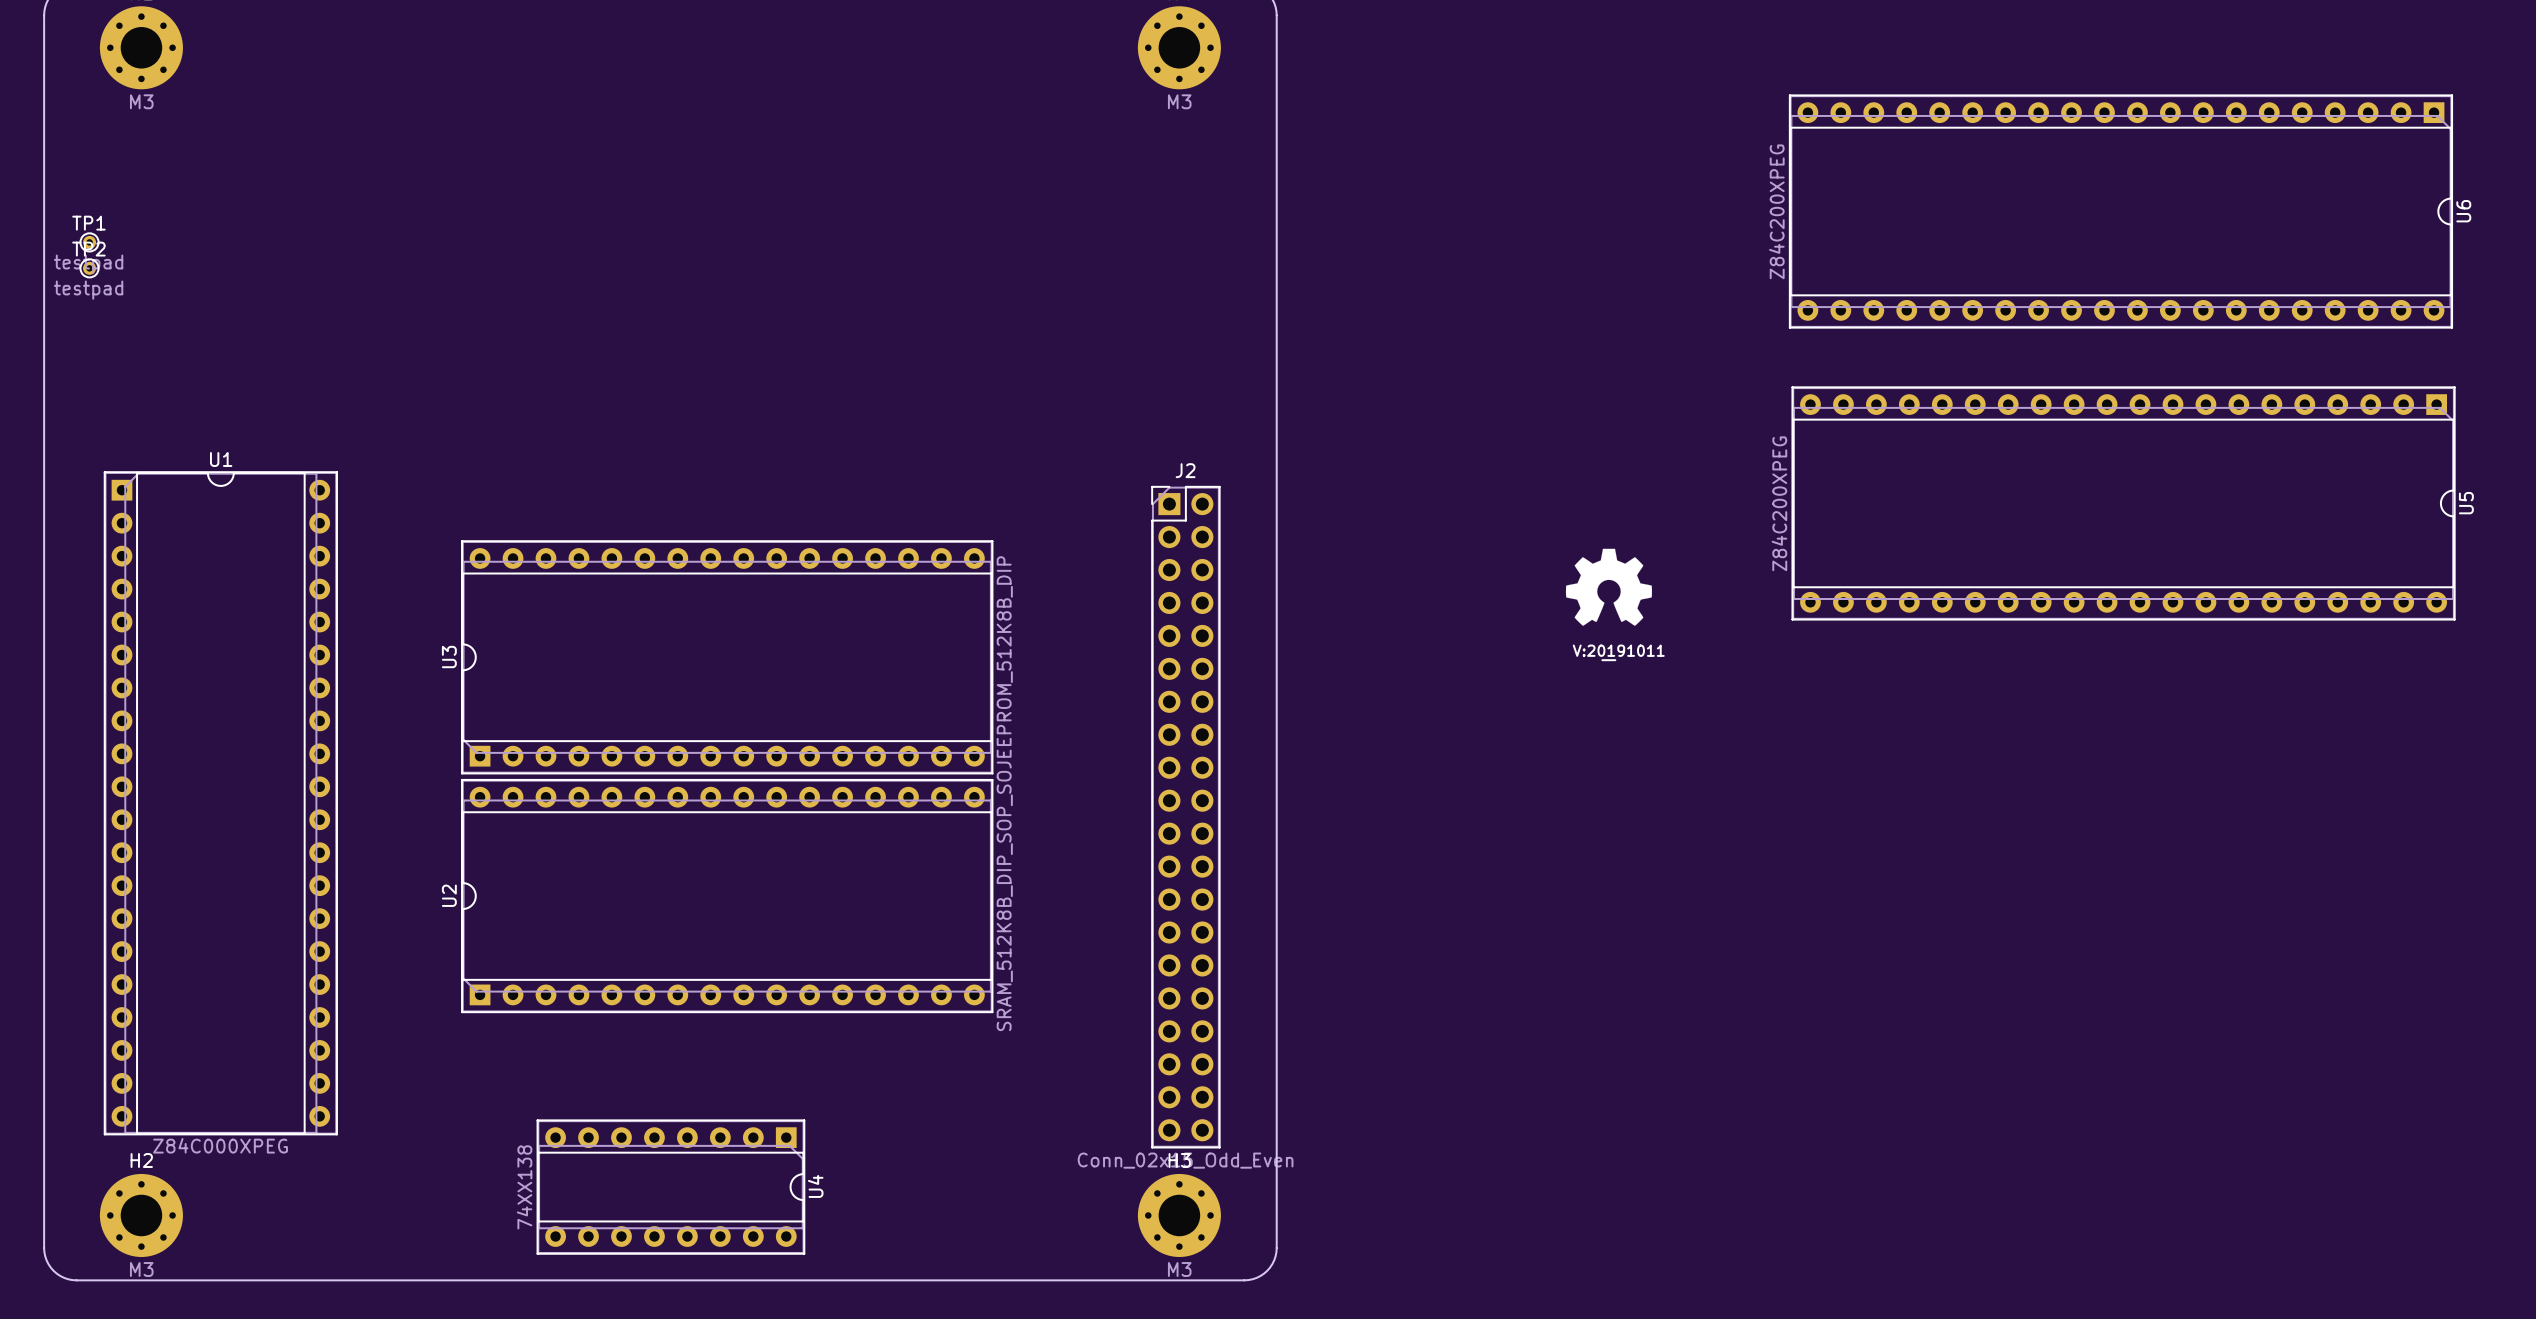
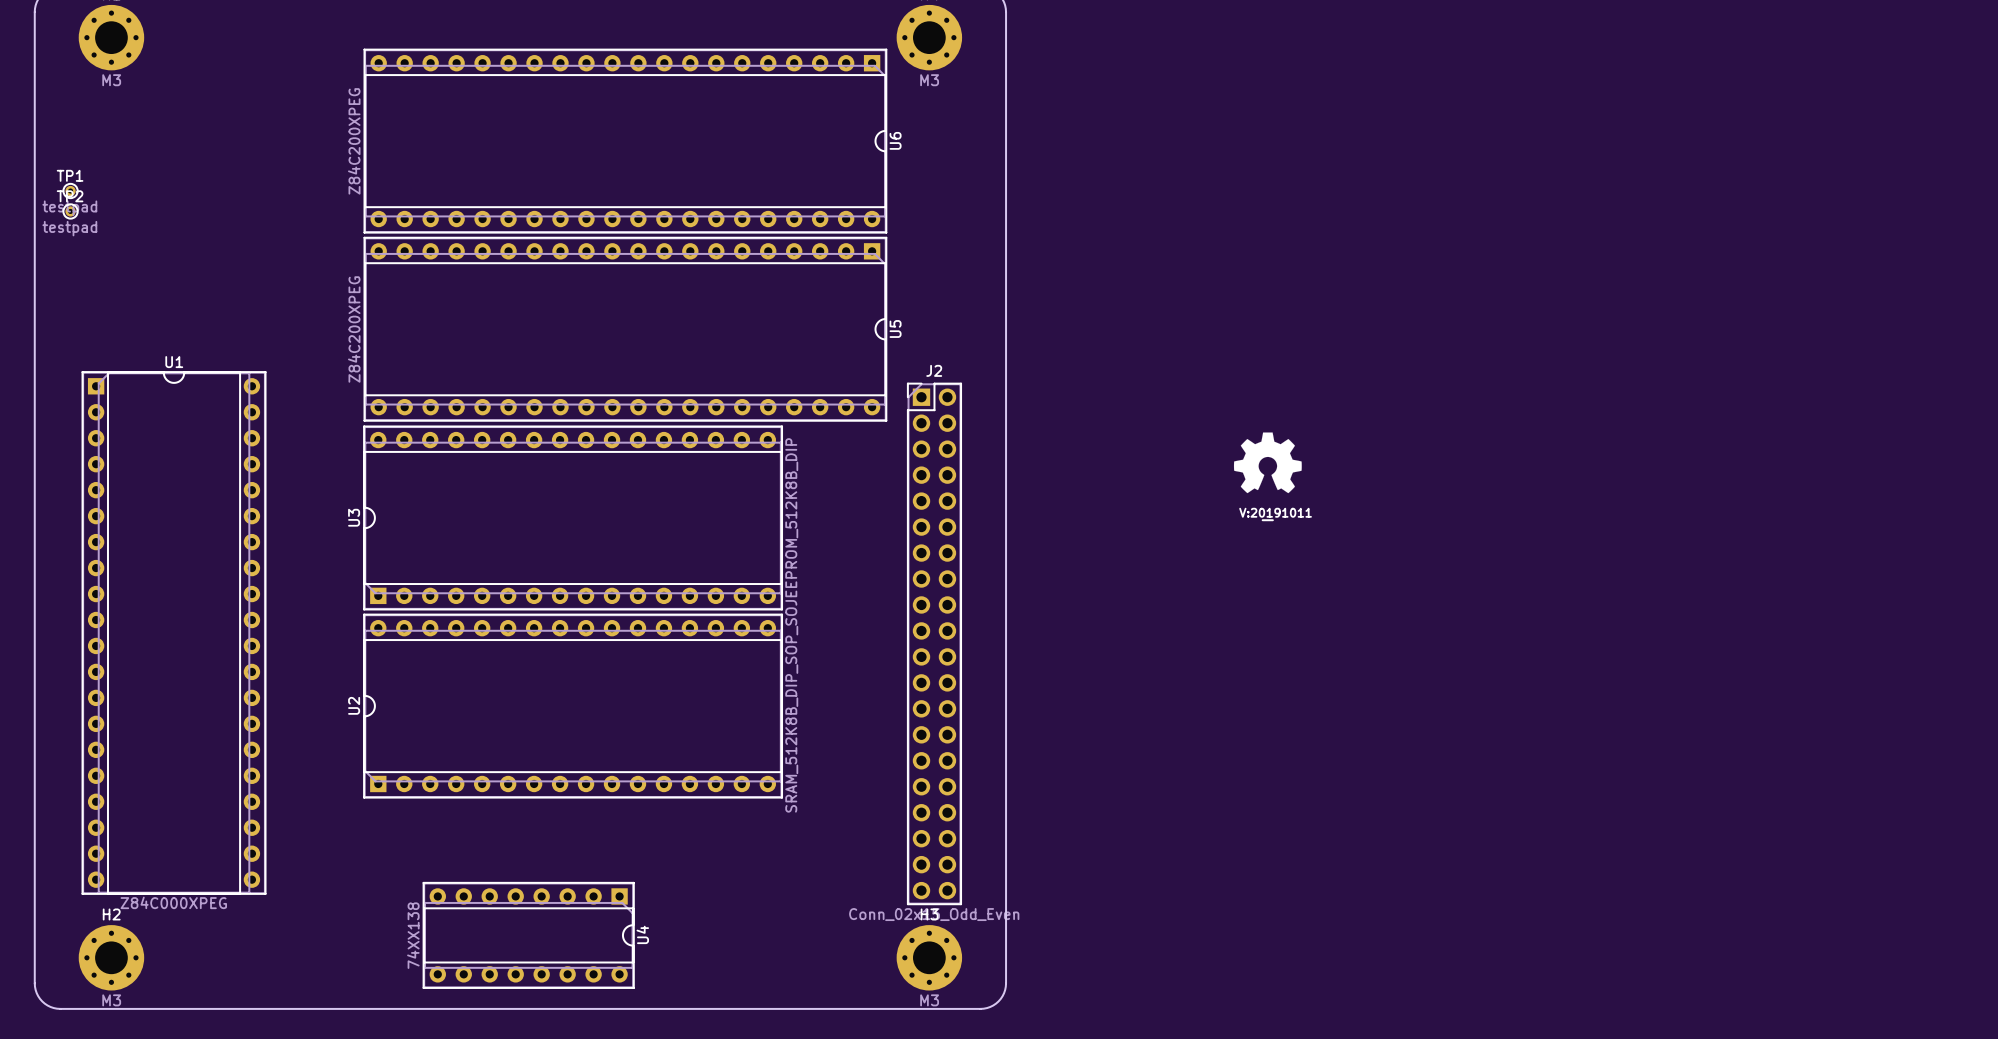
U6 position: (2120, 211) -> (625, 141)
U5 position: (2123, 503) -> (625, 329)

